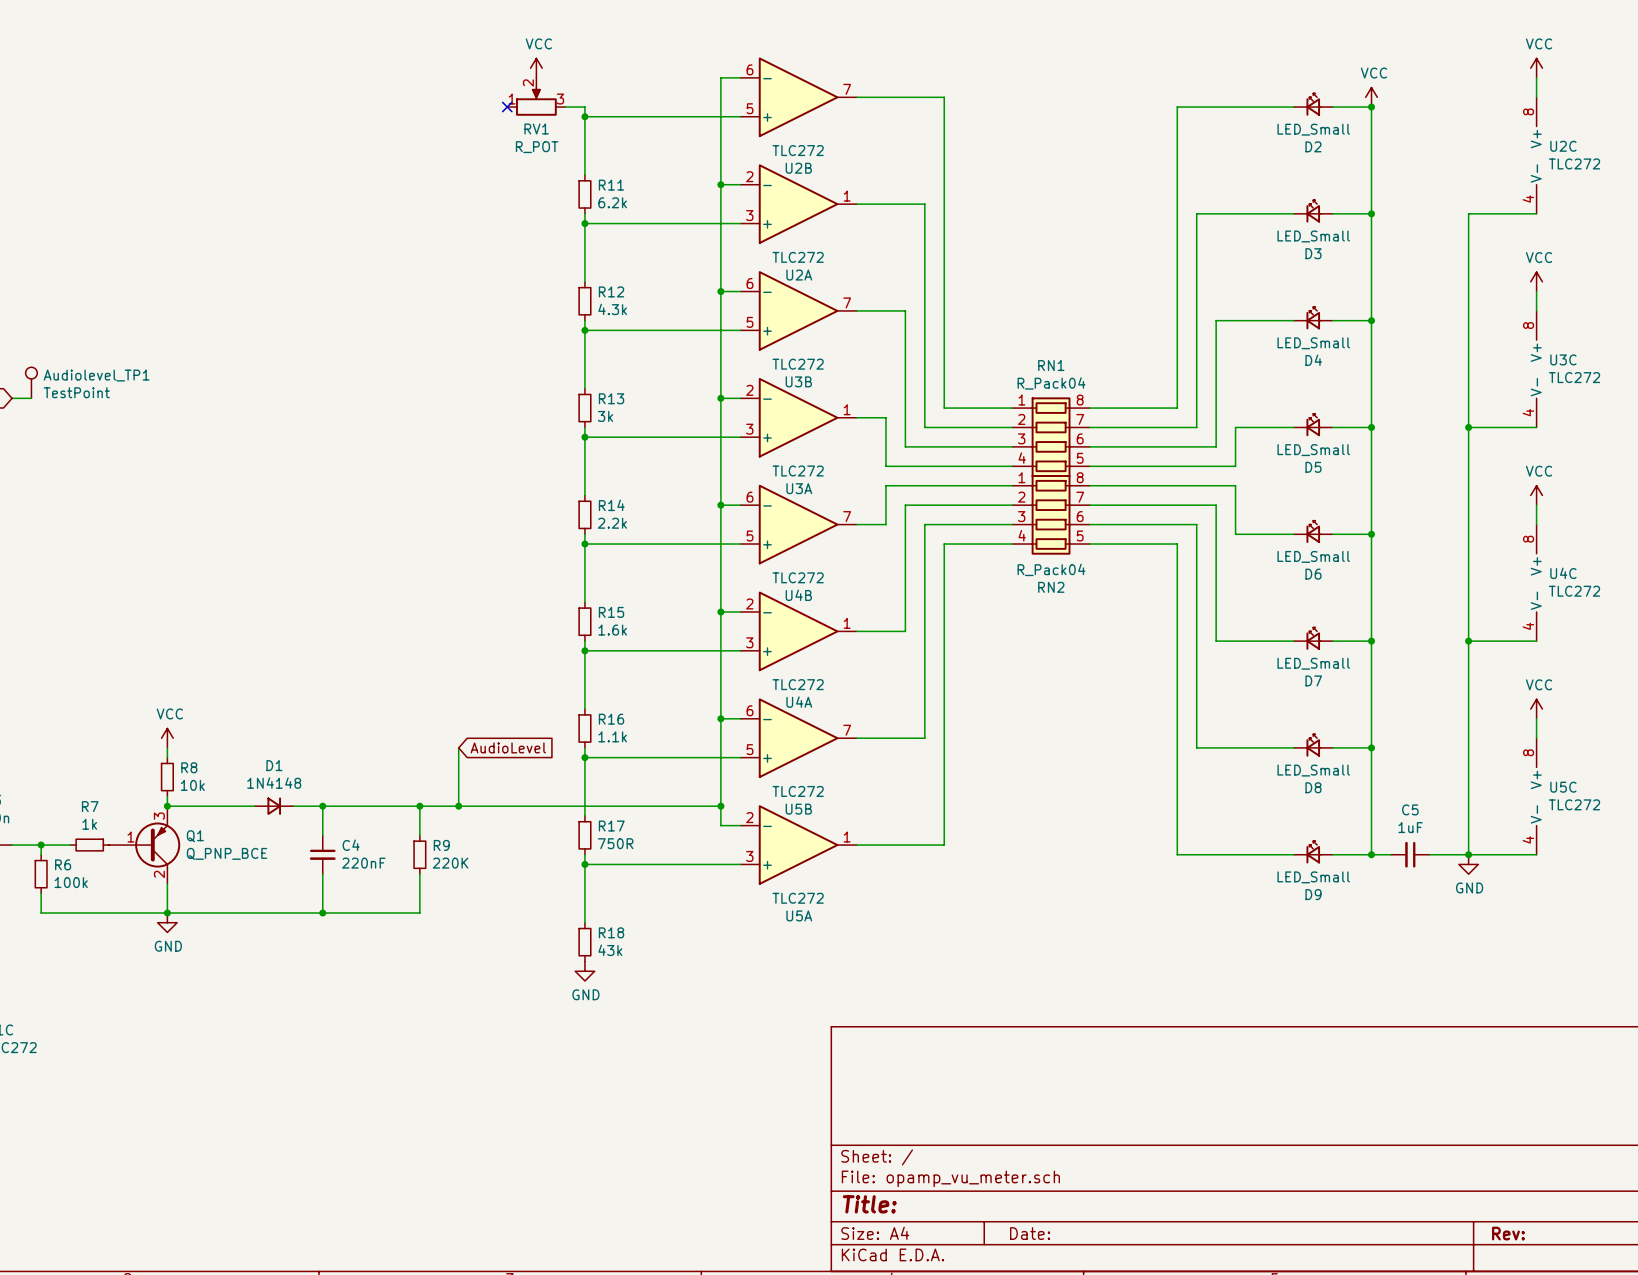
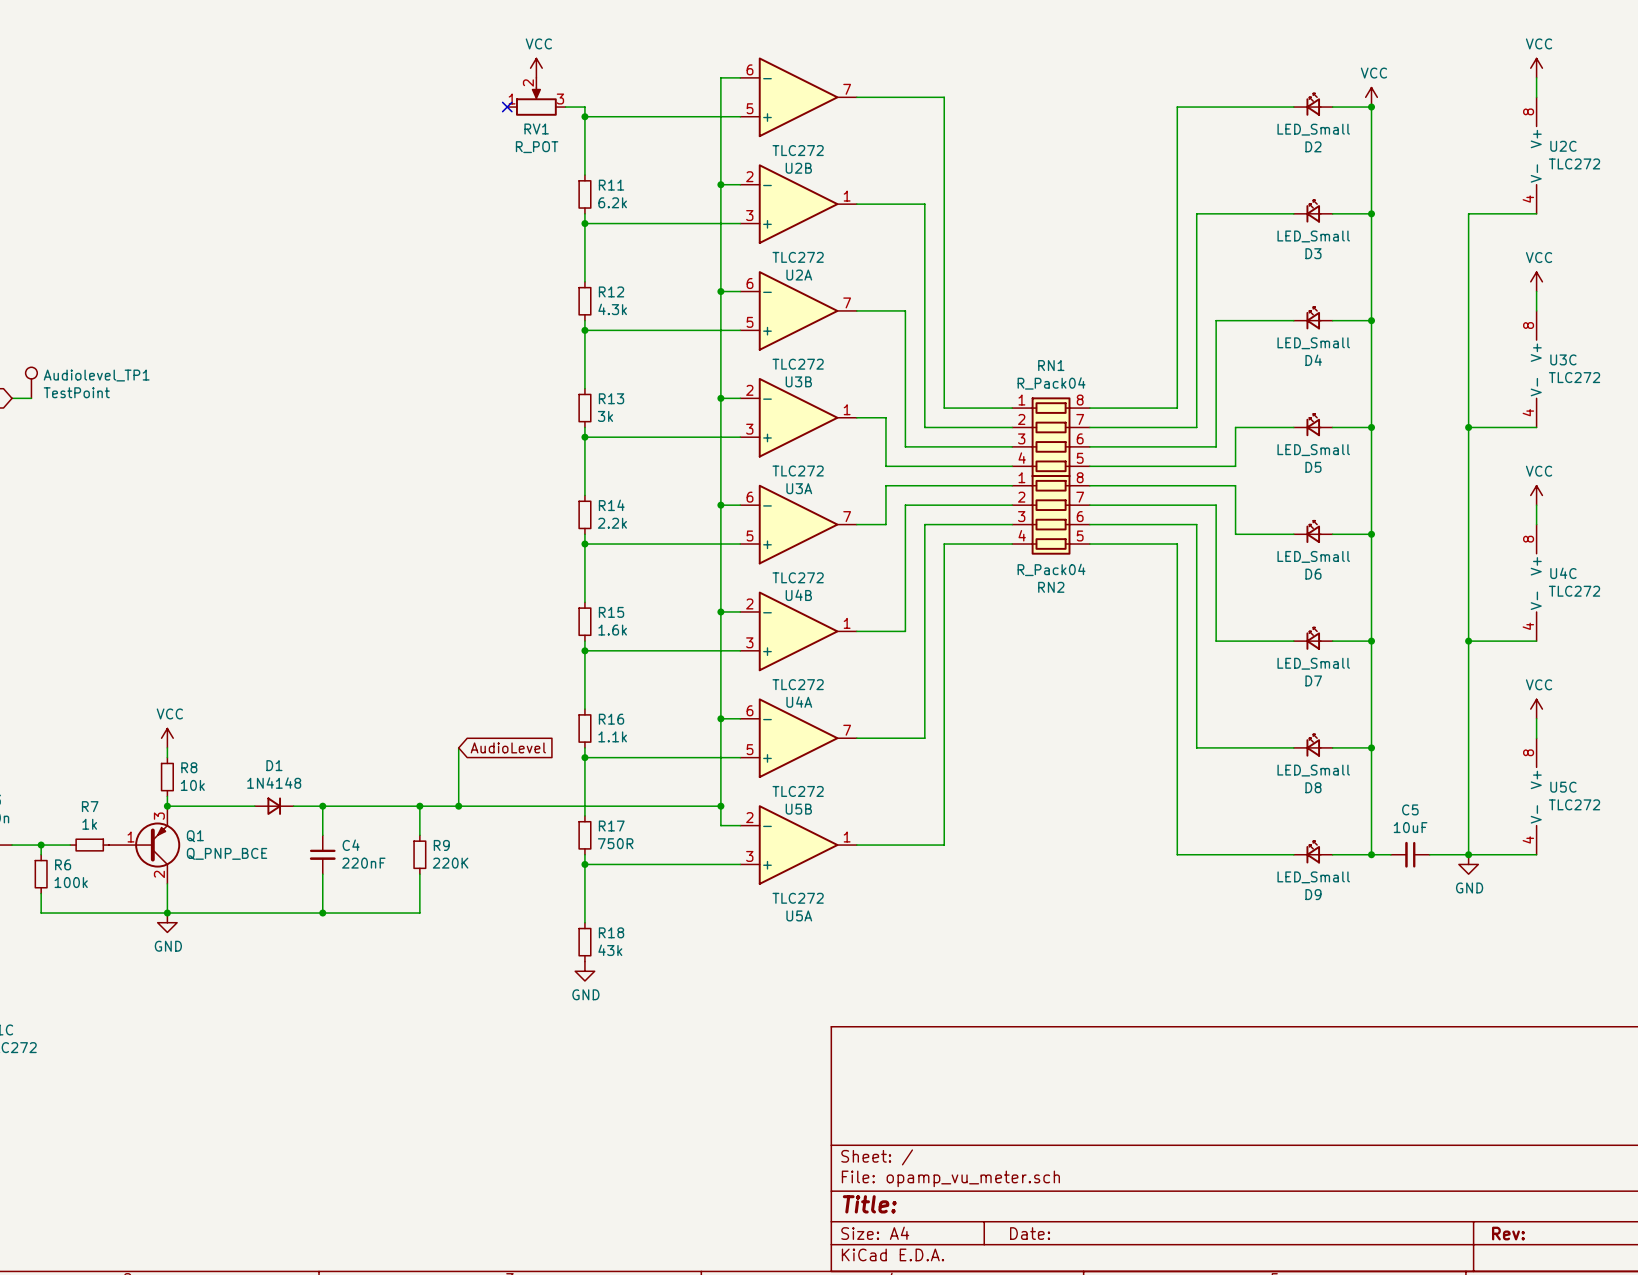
C5 value: 1uF (1410, 827) -> 10uF (1410, 827)

